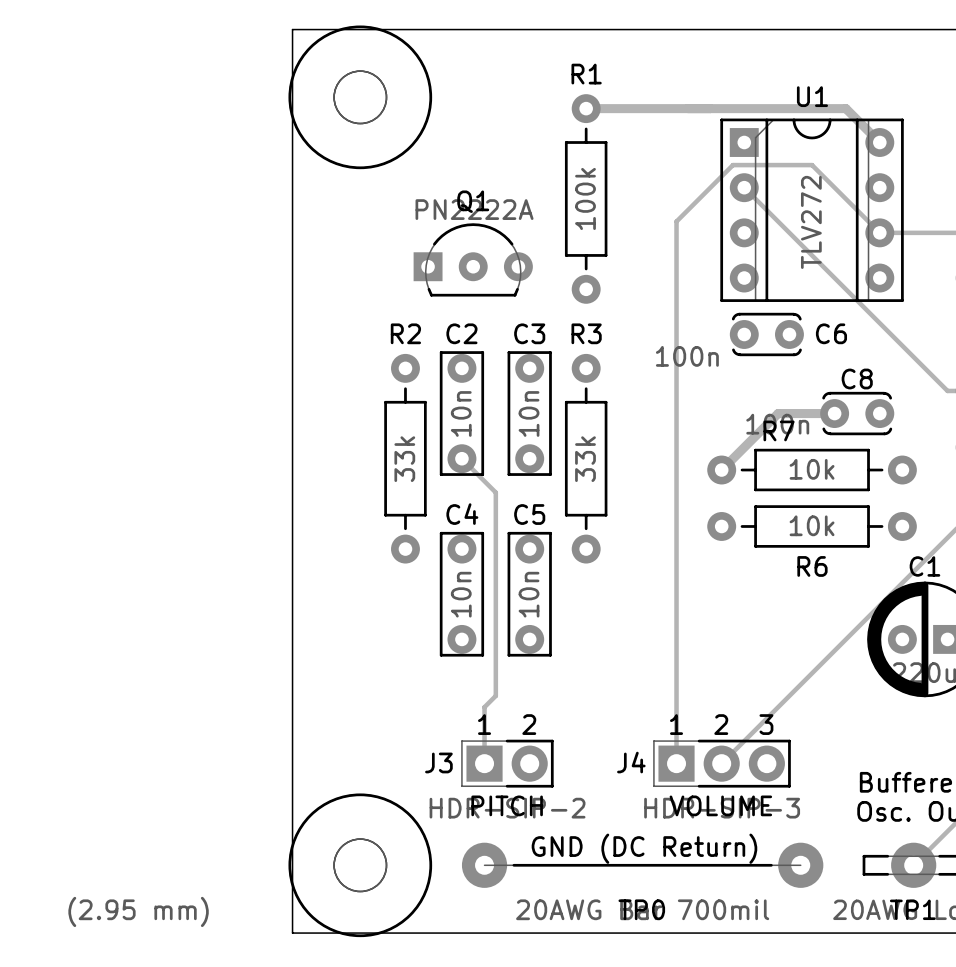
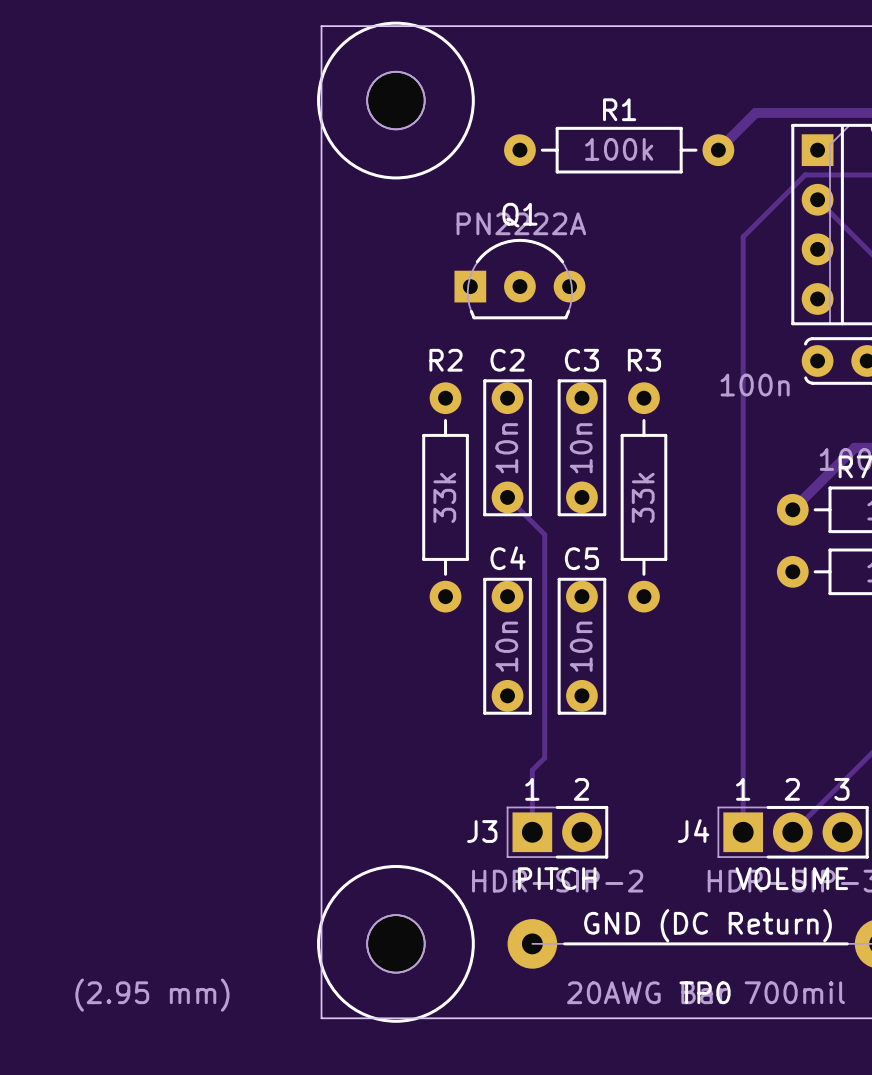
R1 name position: R1 (586, 74) -> R1 (619, 109)
track: (586, 108) (687, 108) -> (718, 150) (755, 112)
R1 rotation: 0° (586, 198) -> 90° clockwise (619, 150)

